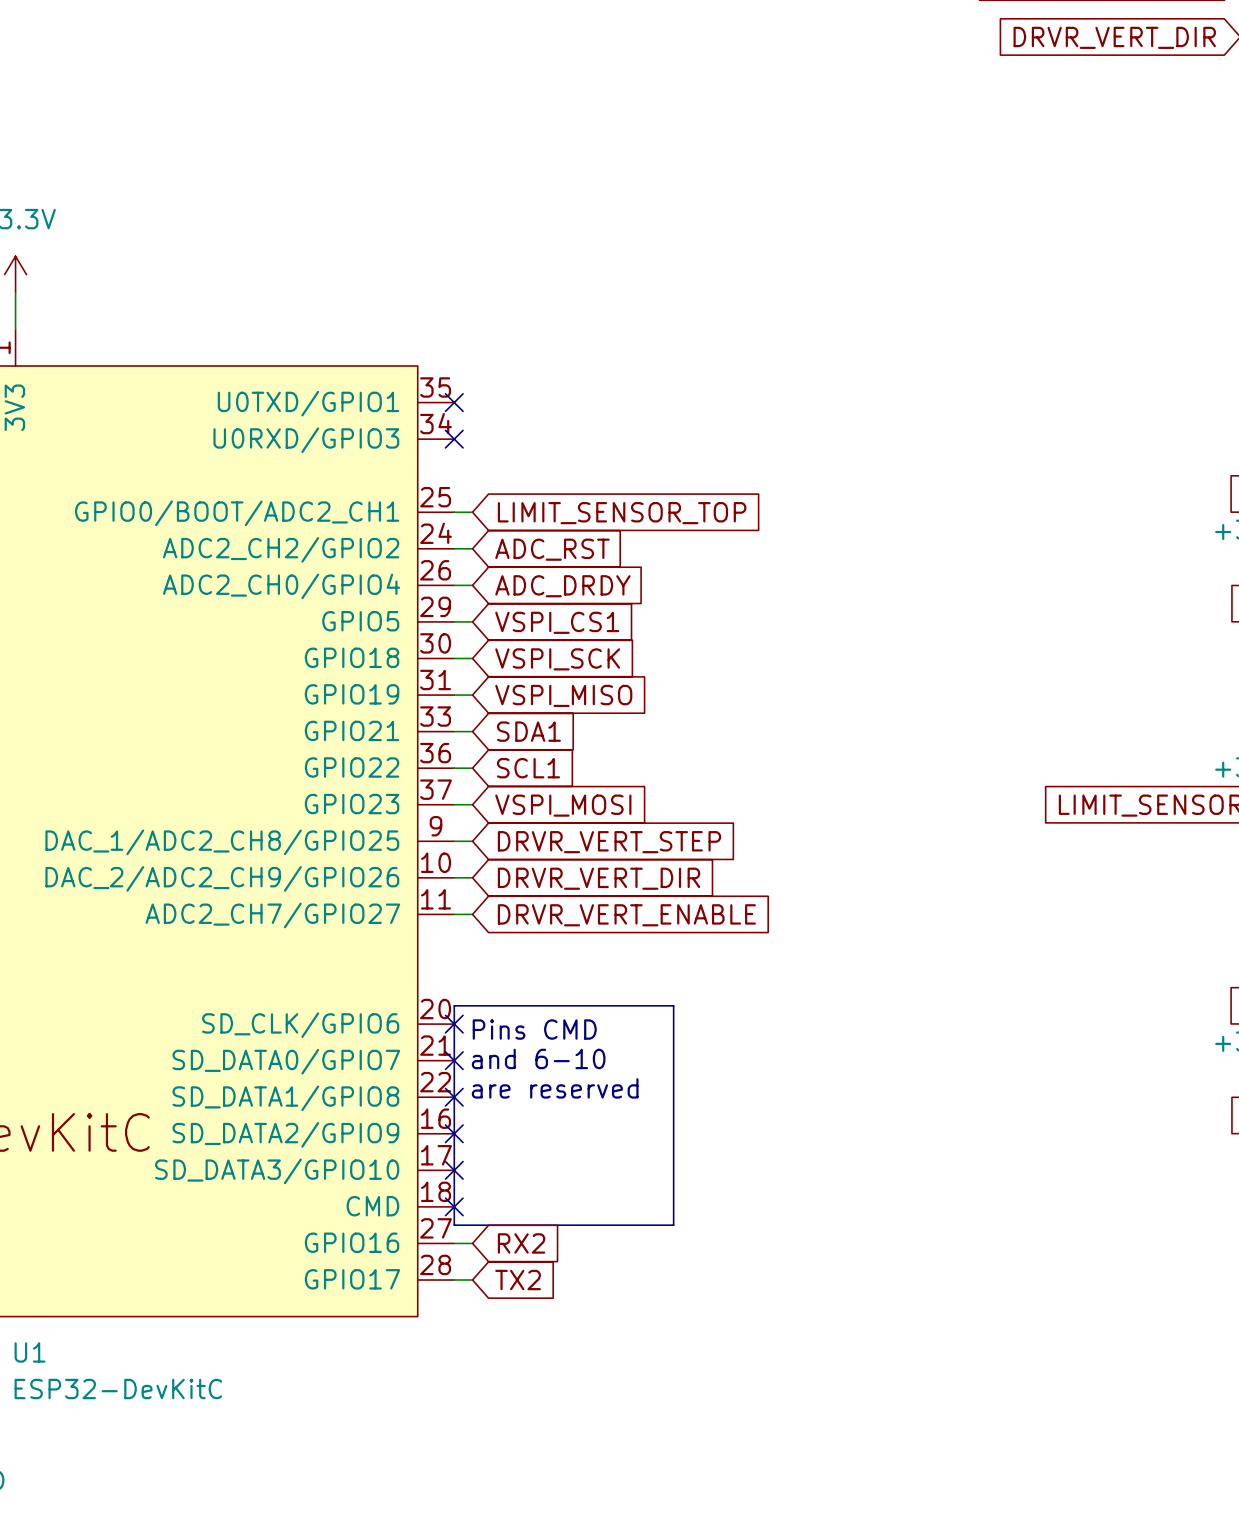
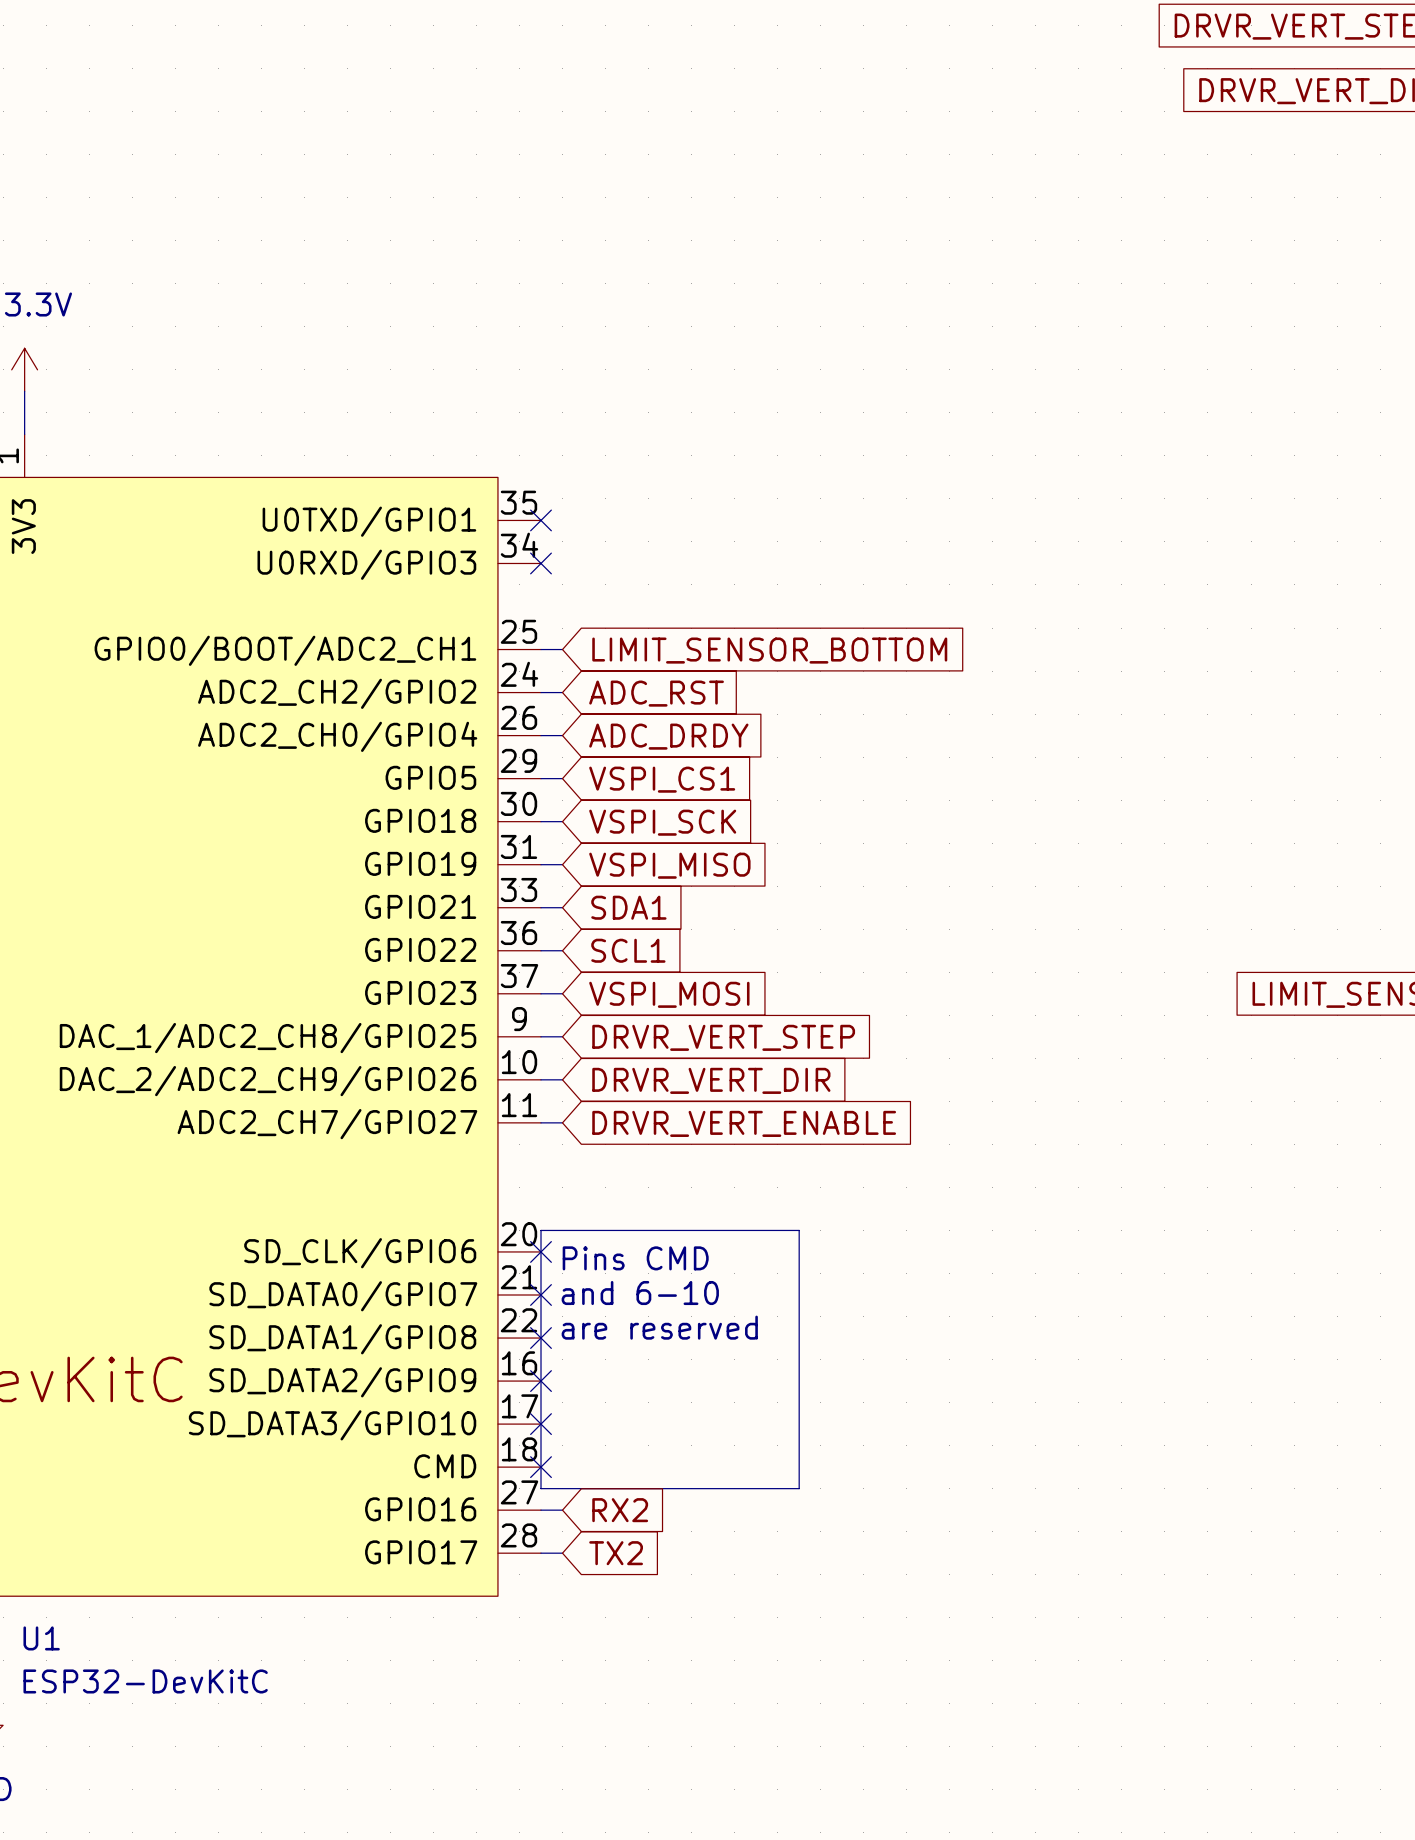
global label: LIMIT_SENSOR_TOP (622, 513) -> LIMIT_SENSOR_BOTTOM (769, 650)

